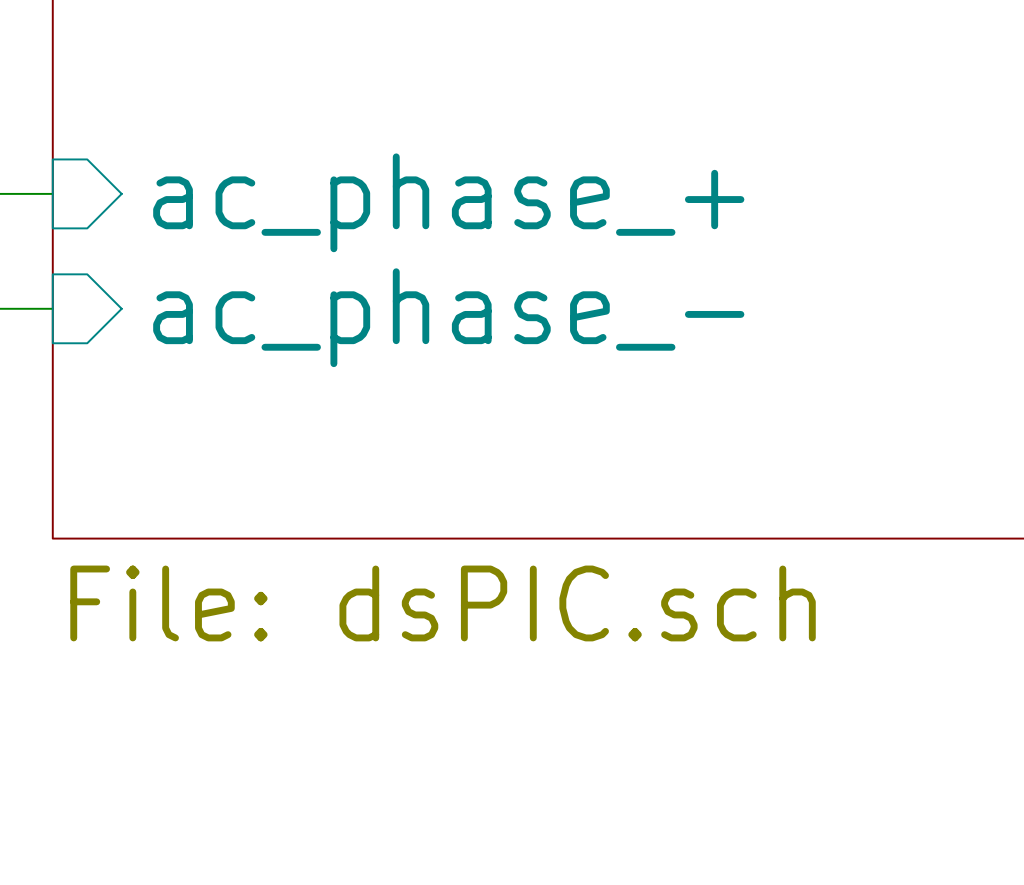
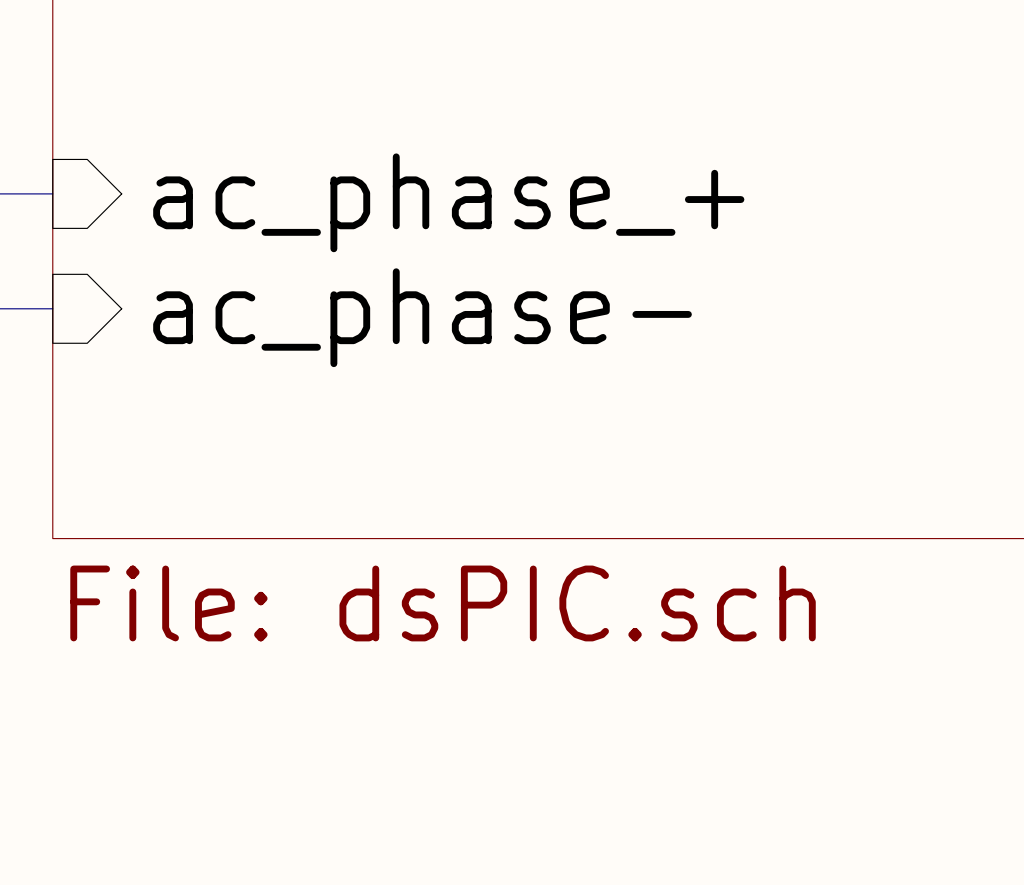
sheet pin: ac_phase_- (448, 317) -> ac_phase- (422, 317)

